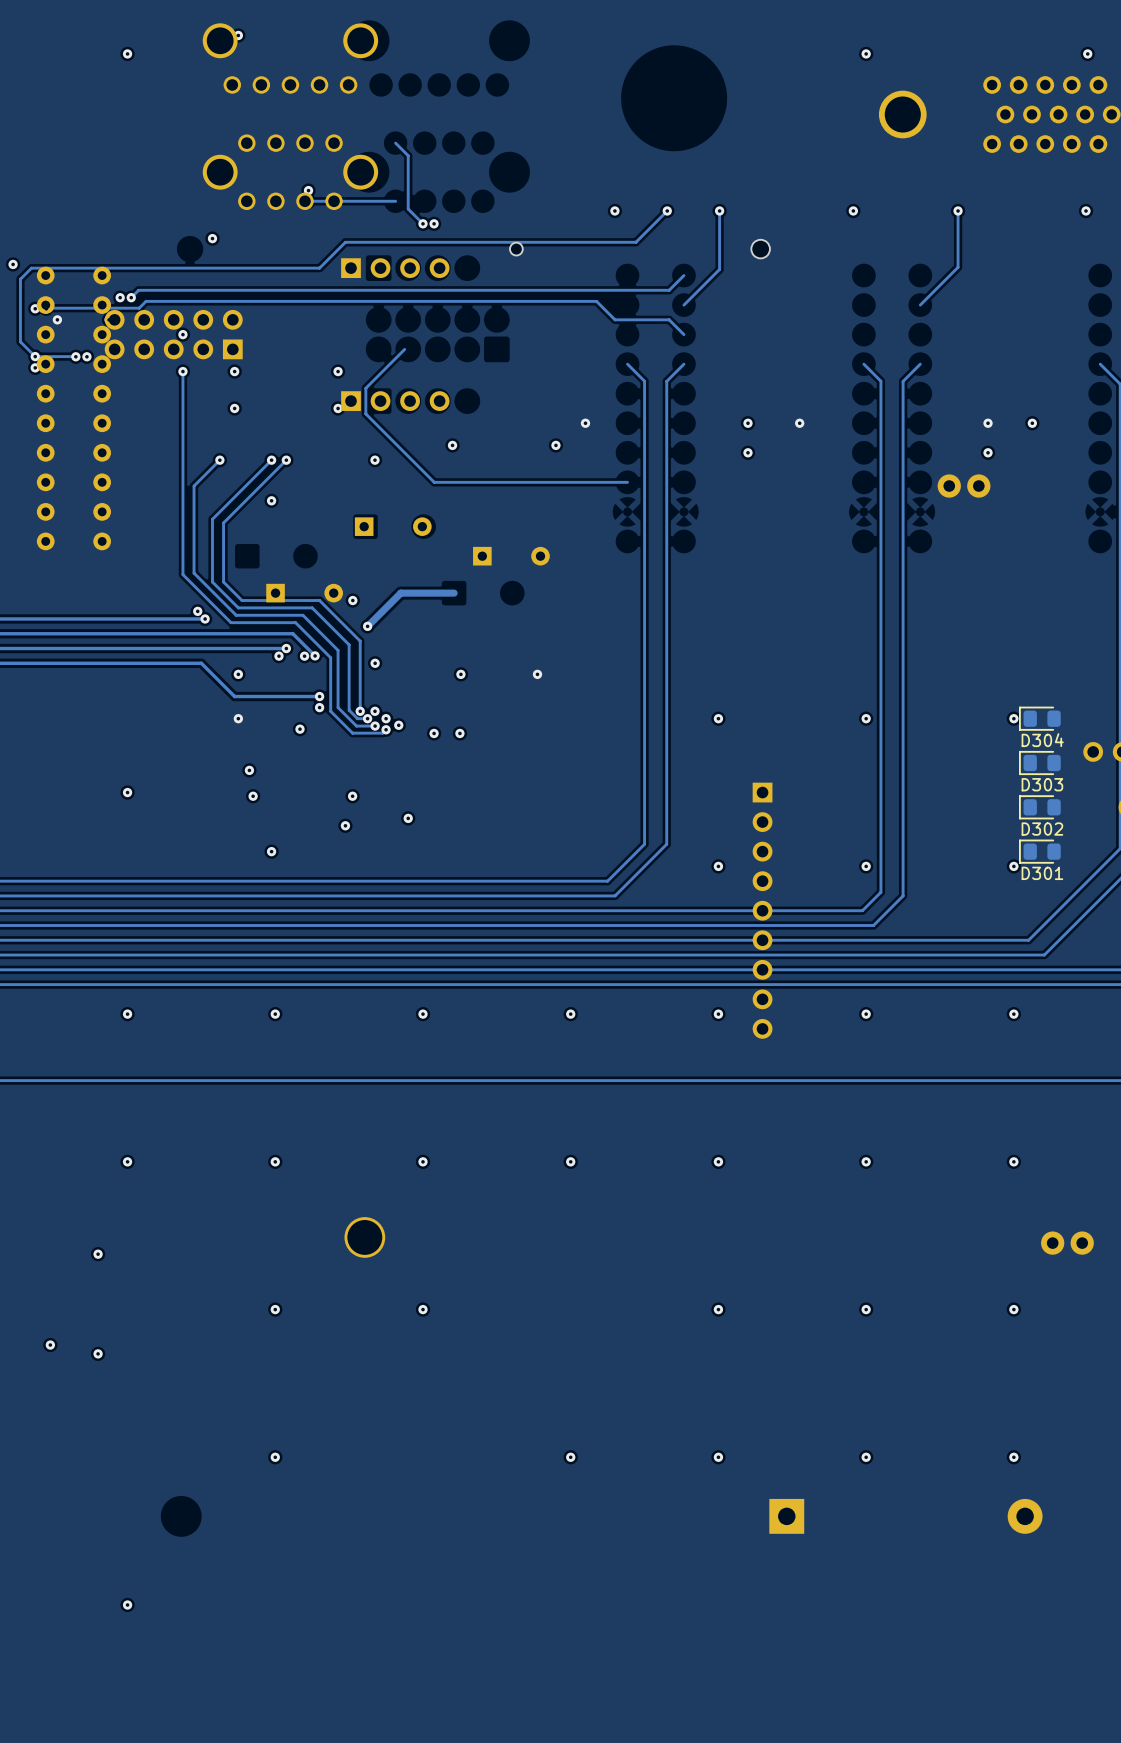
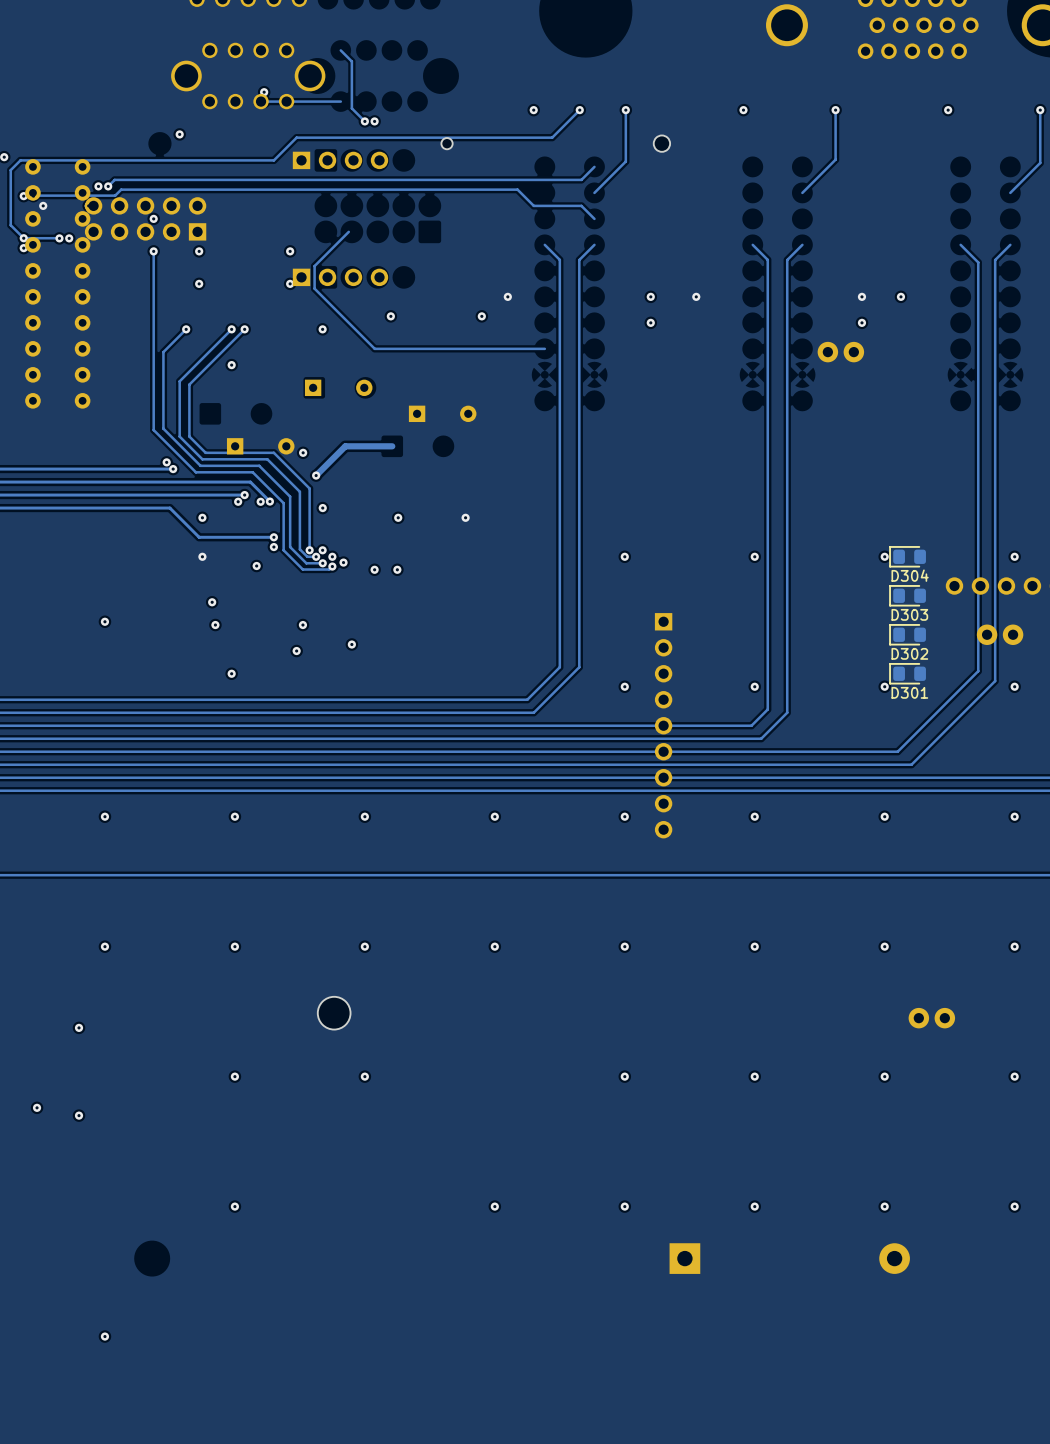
part: (364, 1237) -> none
part: none -> (334, 1013)

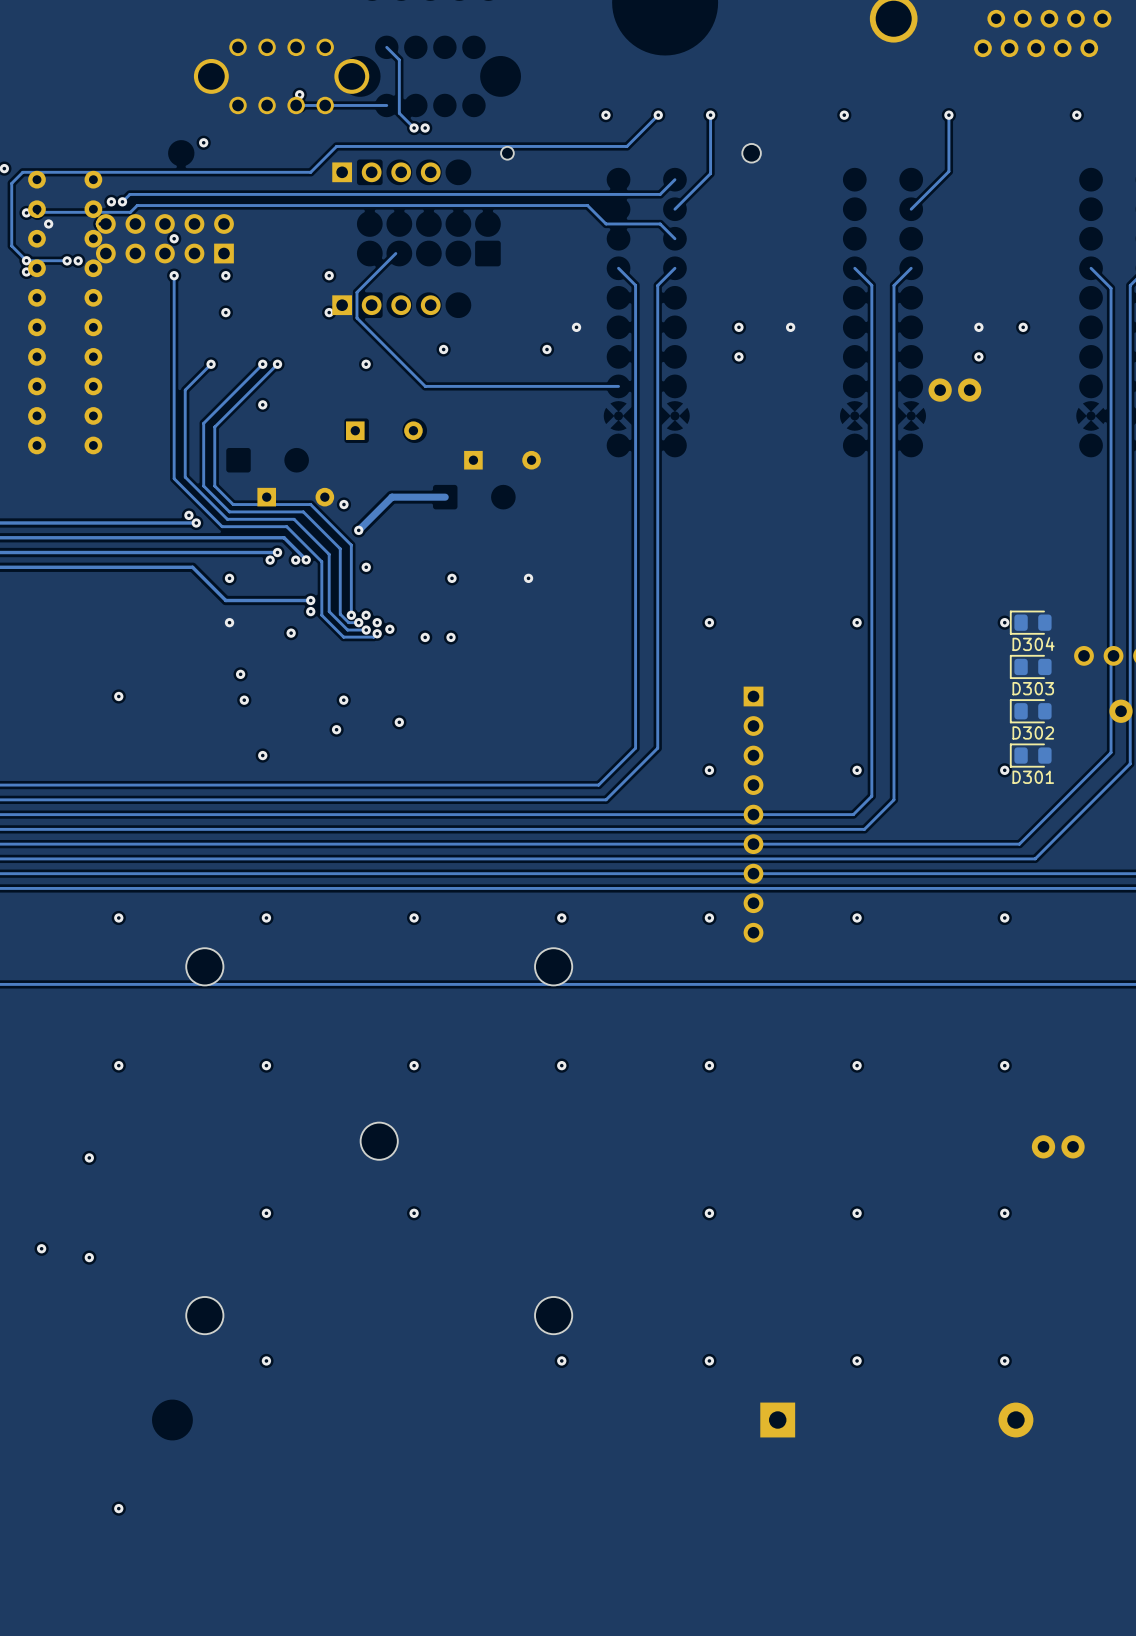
part: none -> (204, 966)
part: none -> (553, 966)
part: none -> (204, 1315)
part: none -> (553, 1315)

